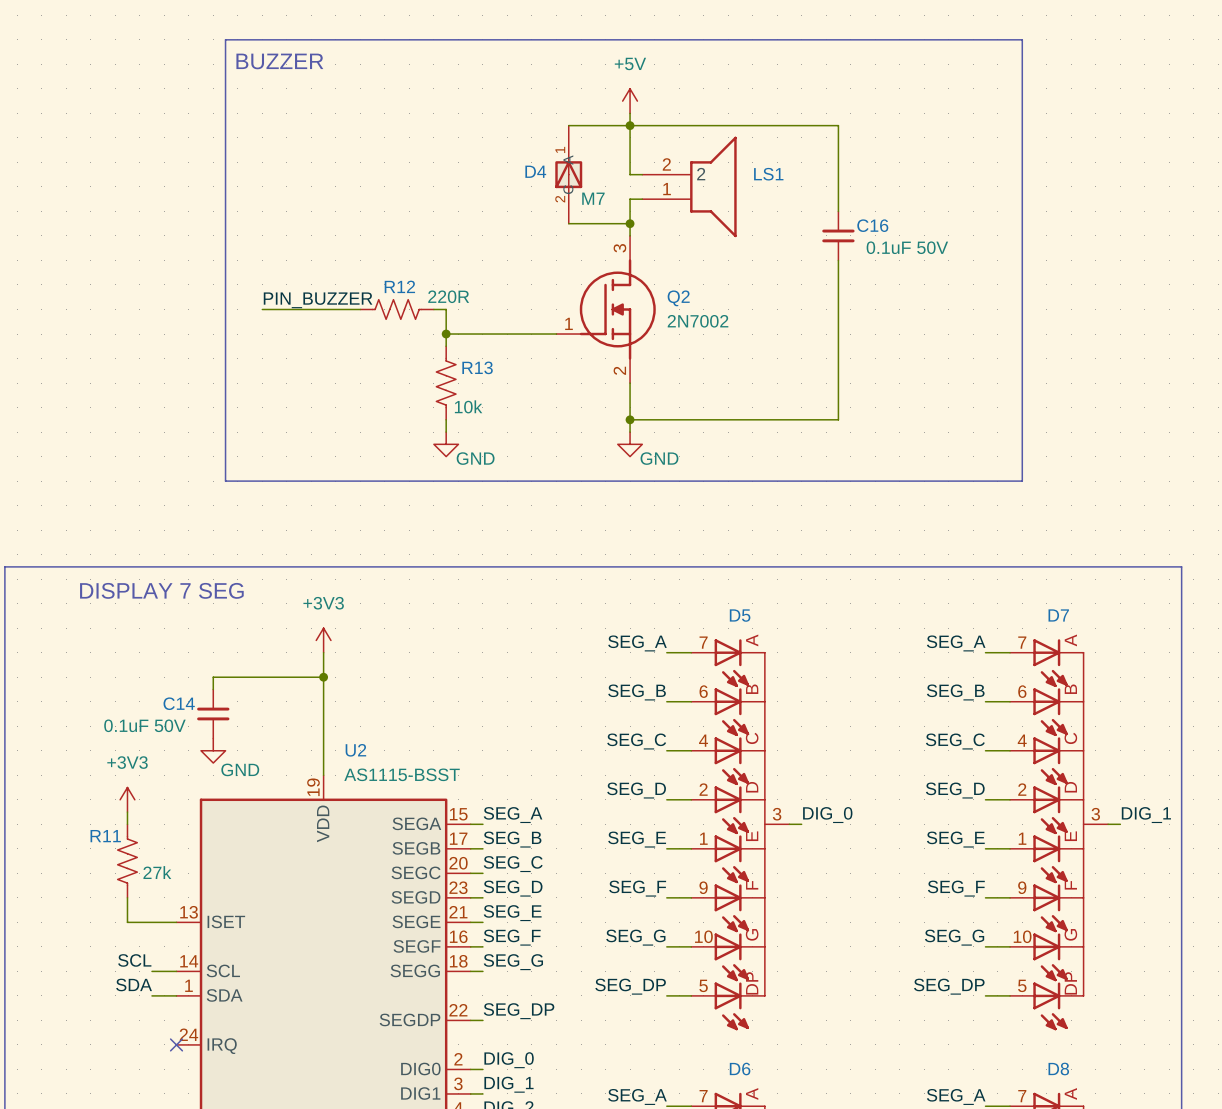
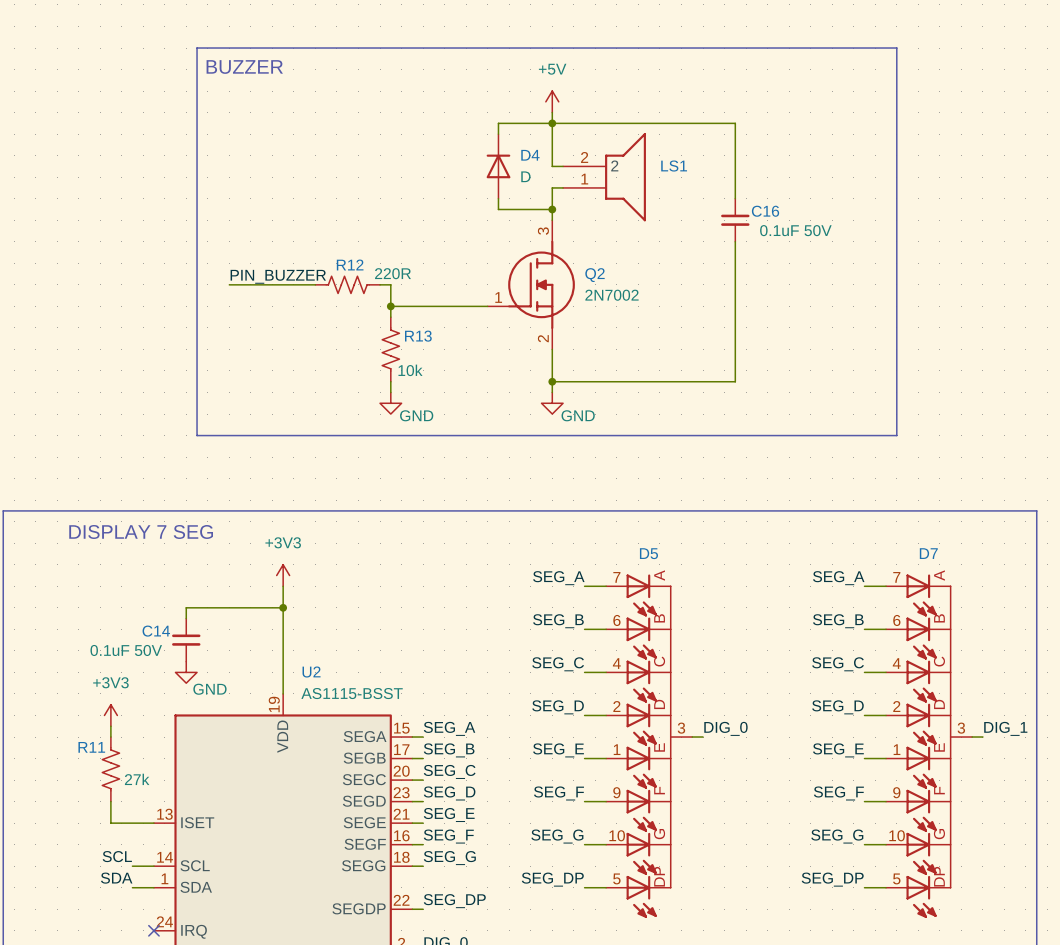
D4 symbol: [555, 125, 583, 224] -> [486, 134, 511, 199]
D4 name position: D4 (535, 171) -> D4 (530, 155)
D4 value: M7 (593, 198) -> D (525, 176)

